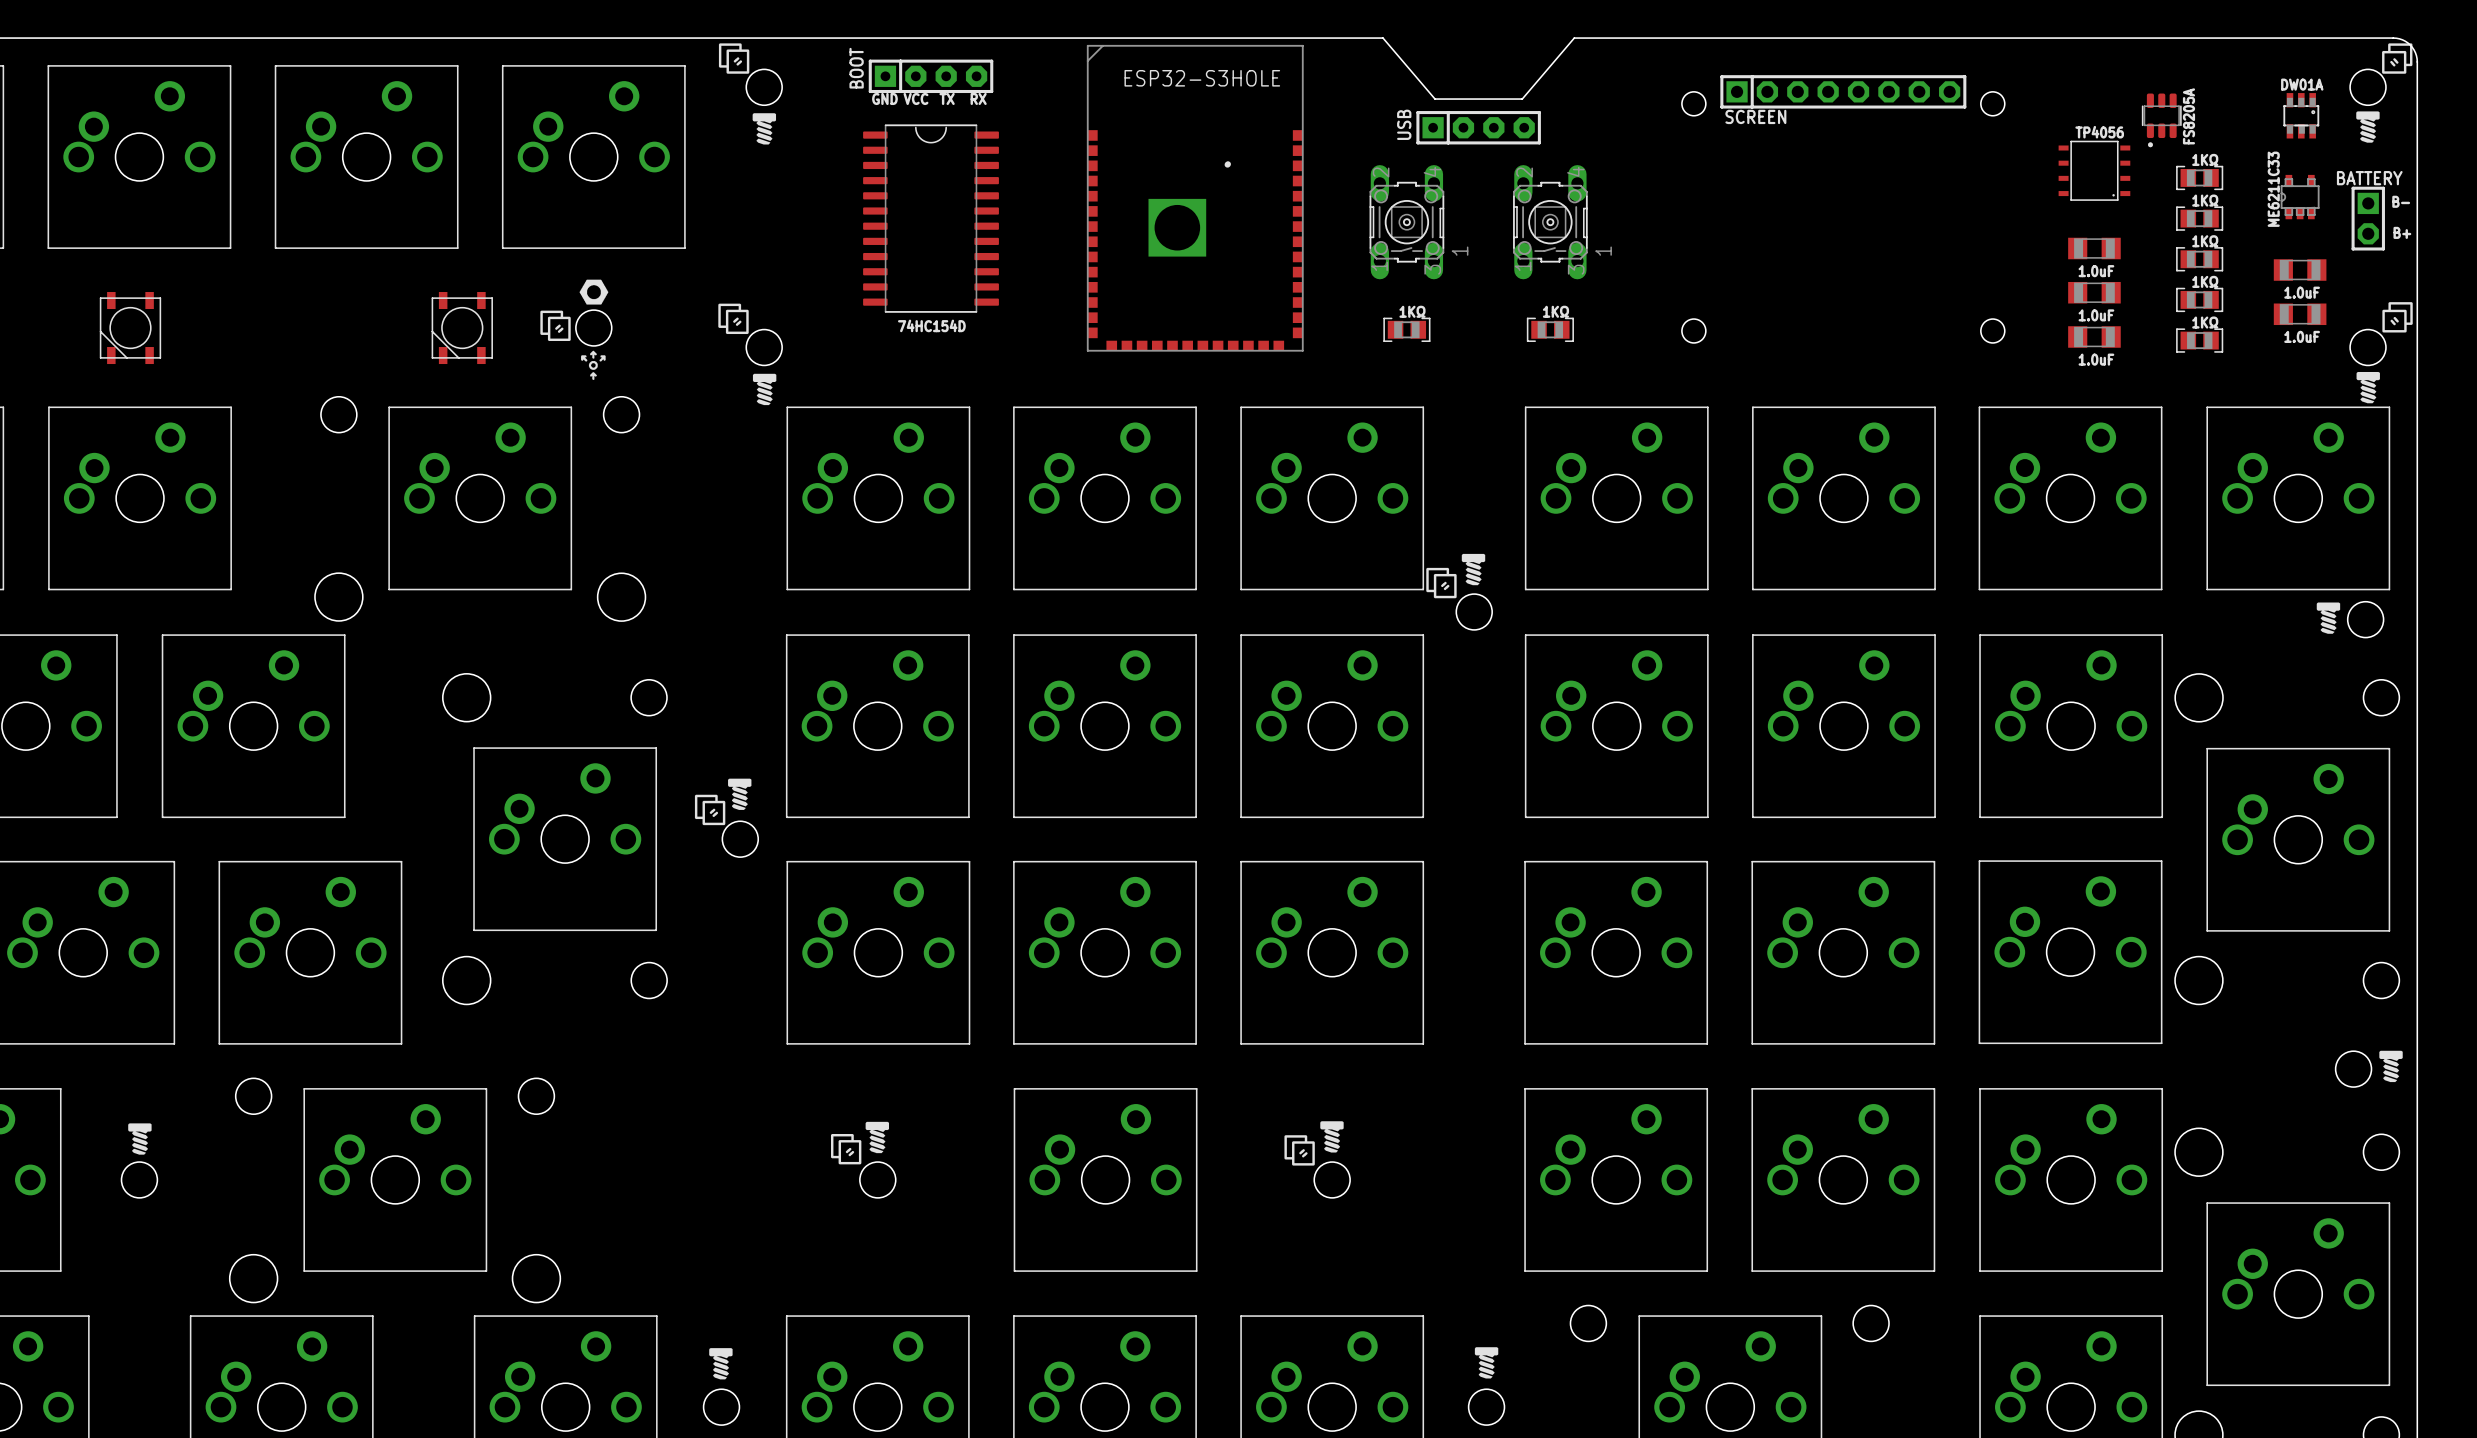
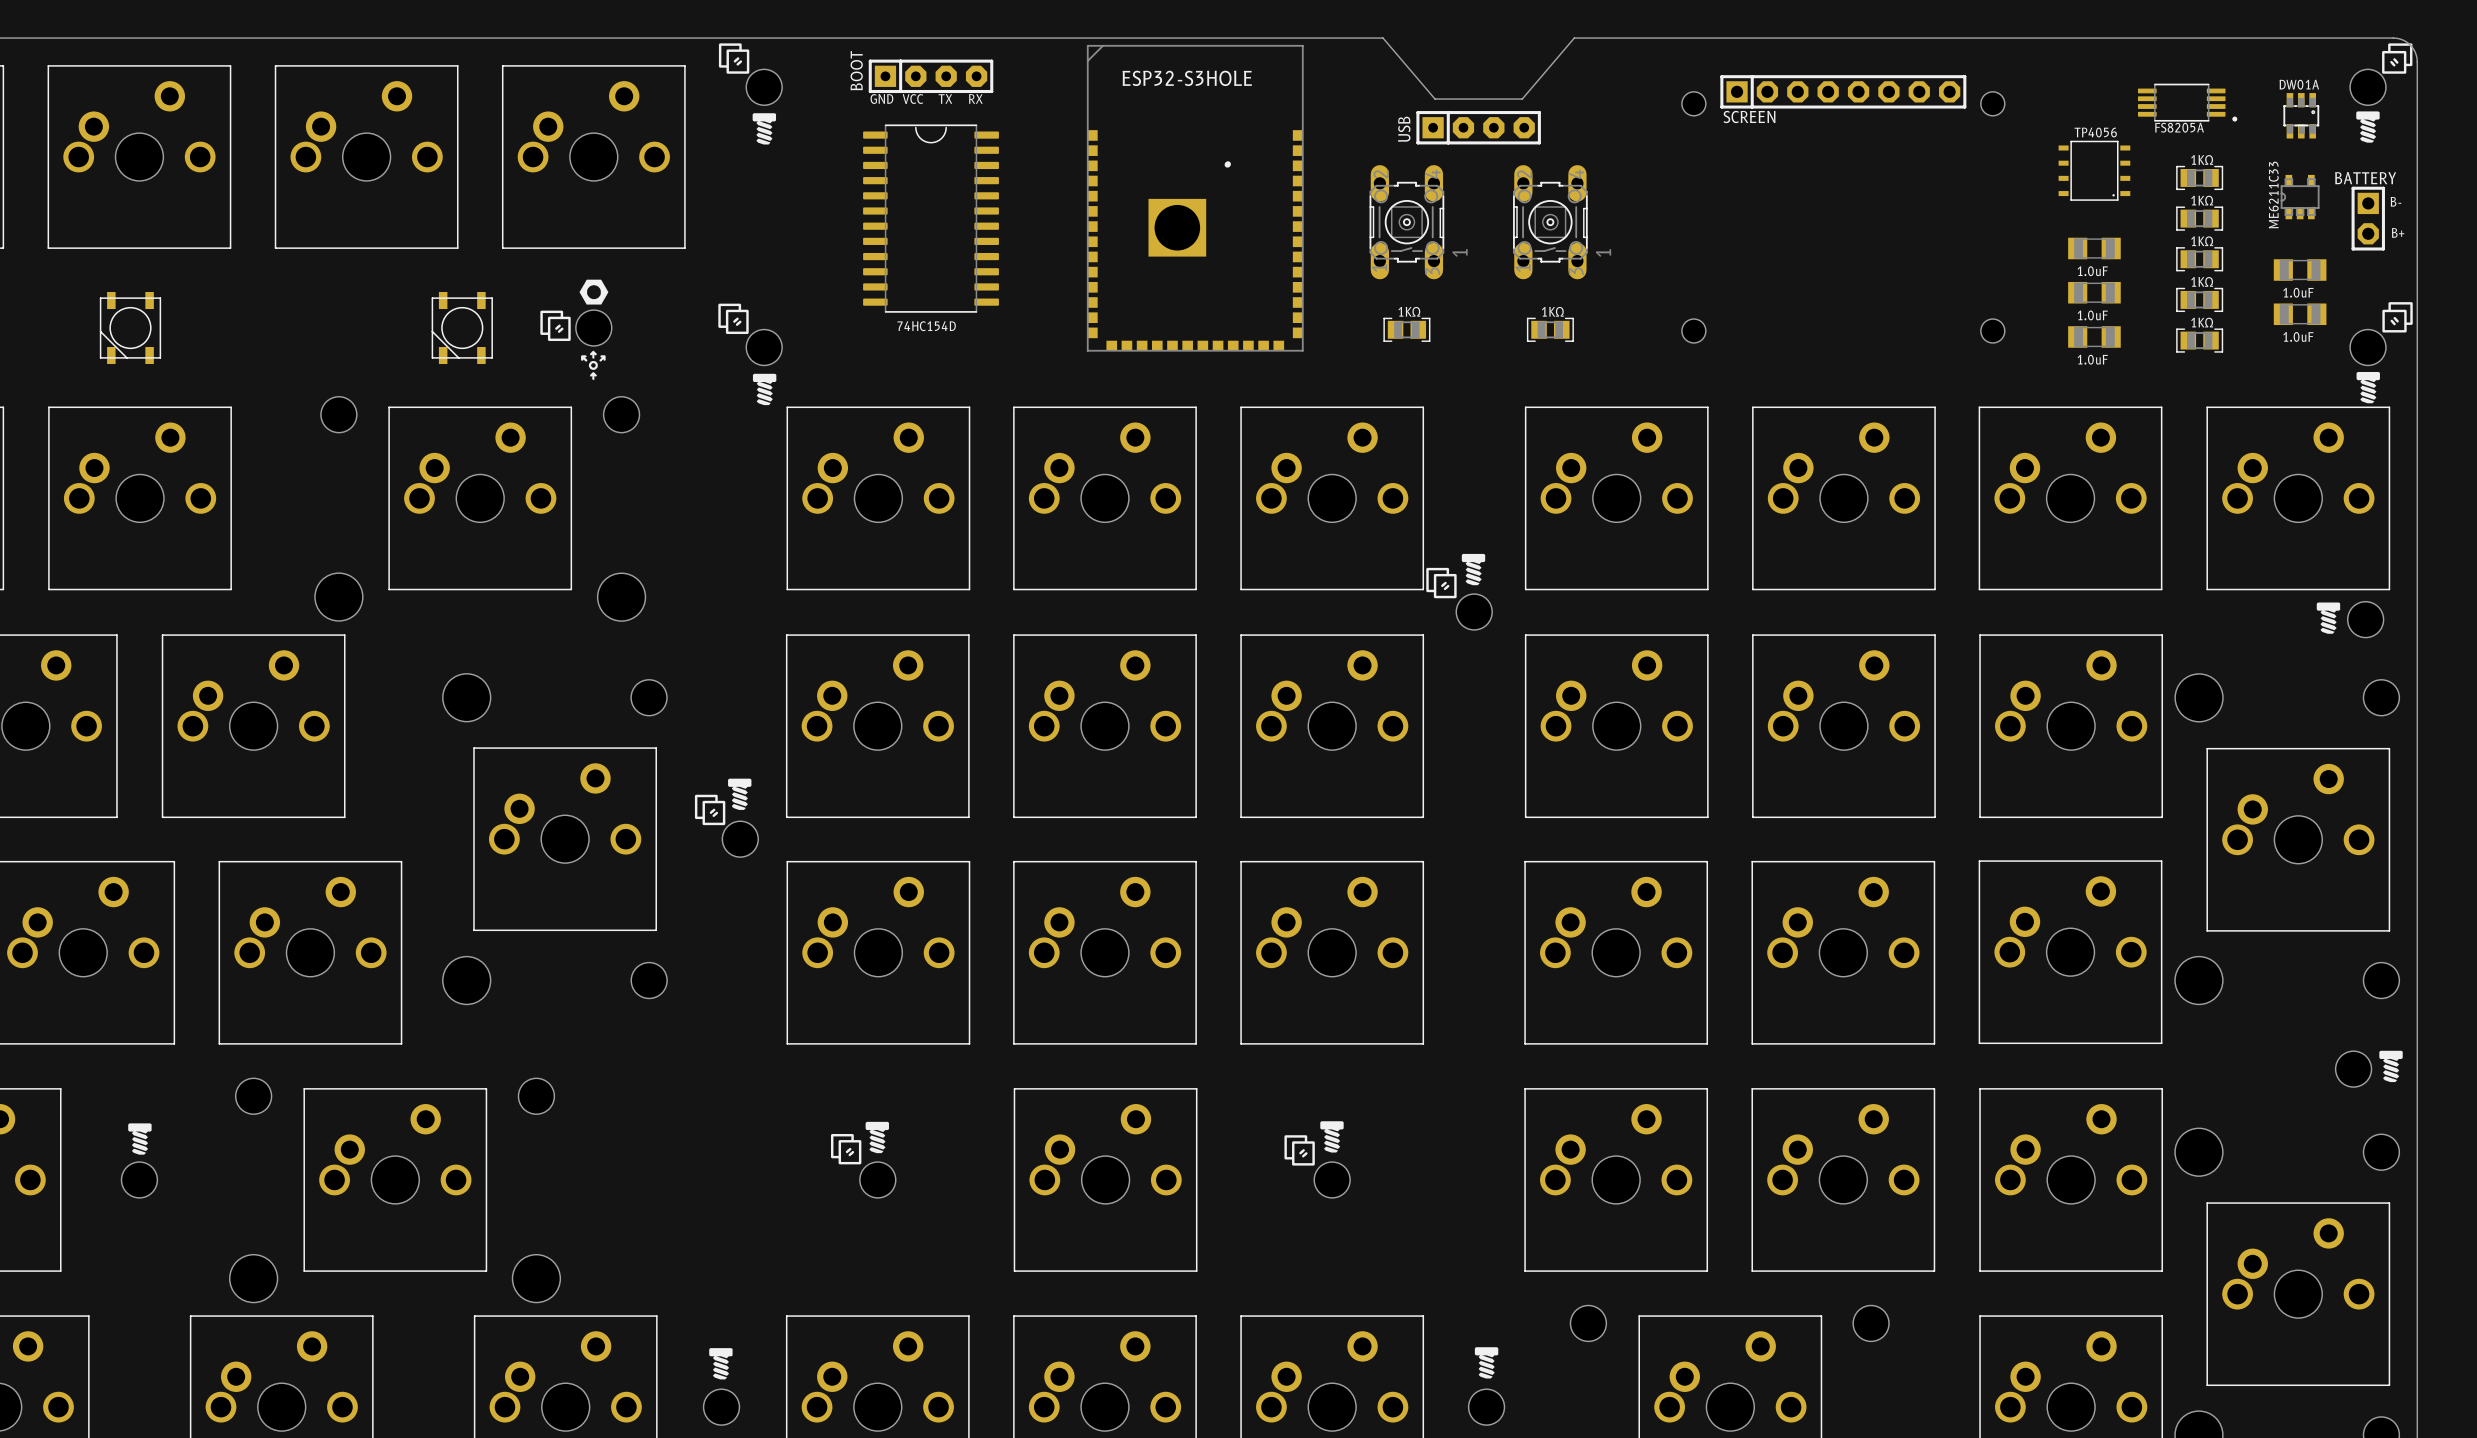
part: none -> (2187, 102)
text rotation: 0° (2188, 116) -> 90° clockwise (2179, 127)
part: (2161, 120) -> none

